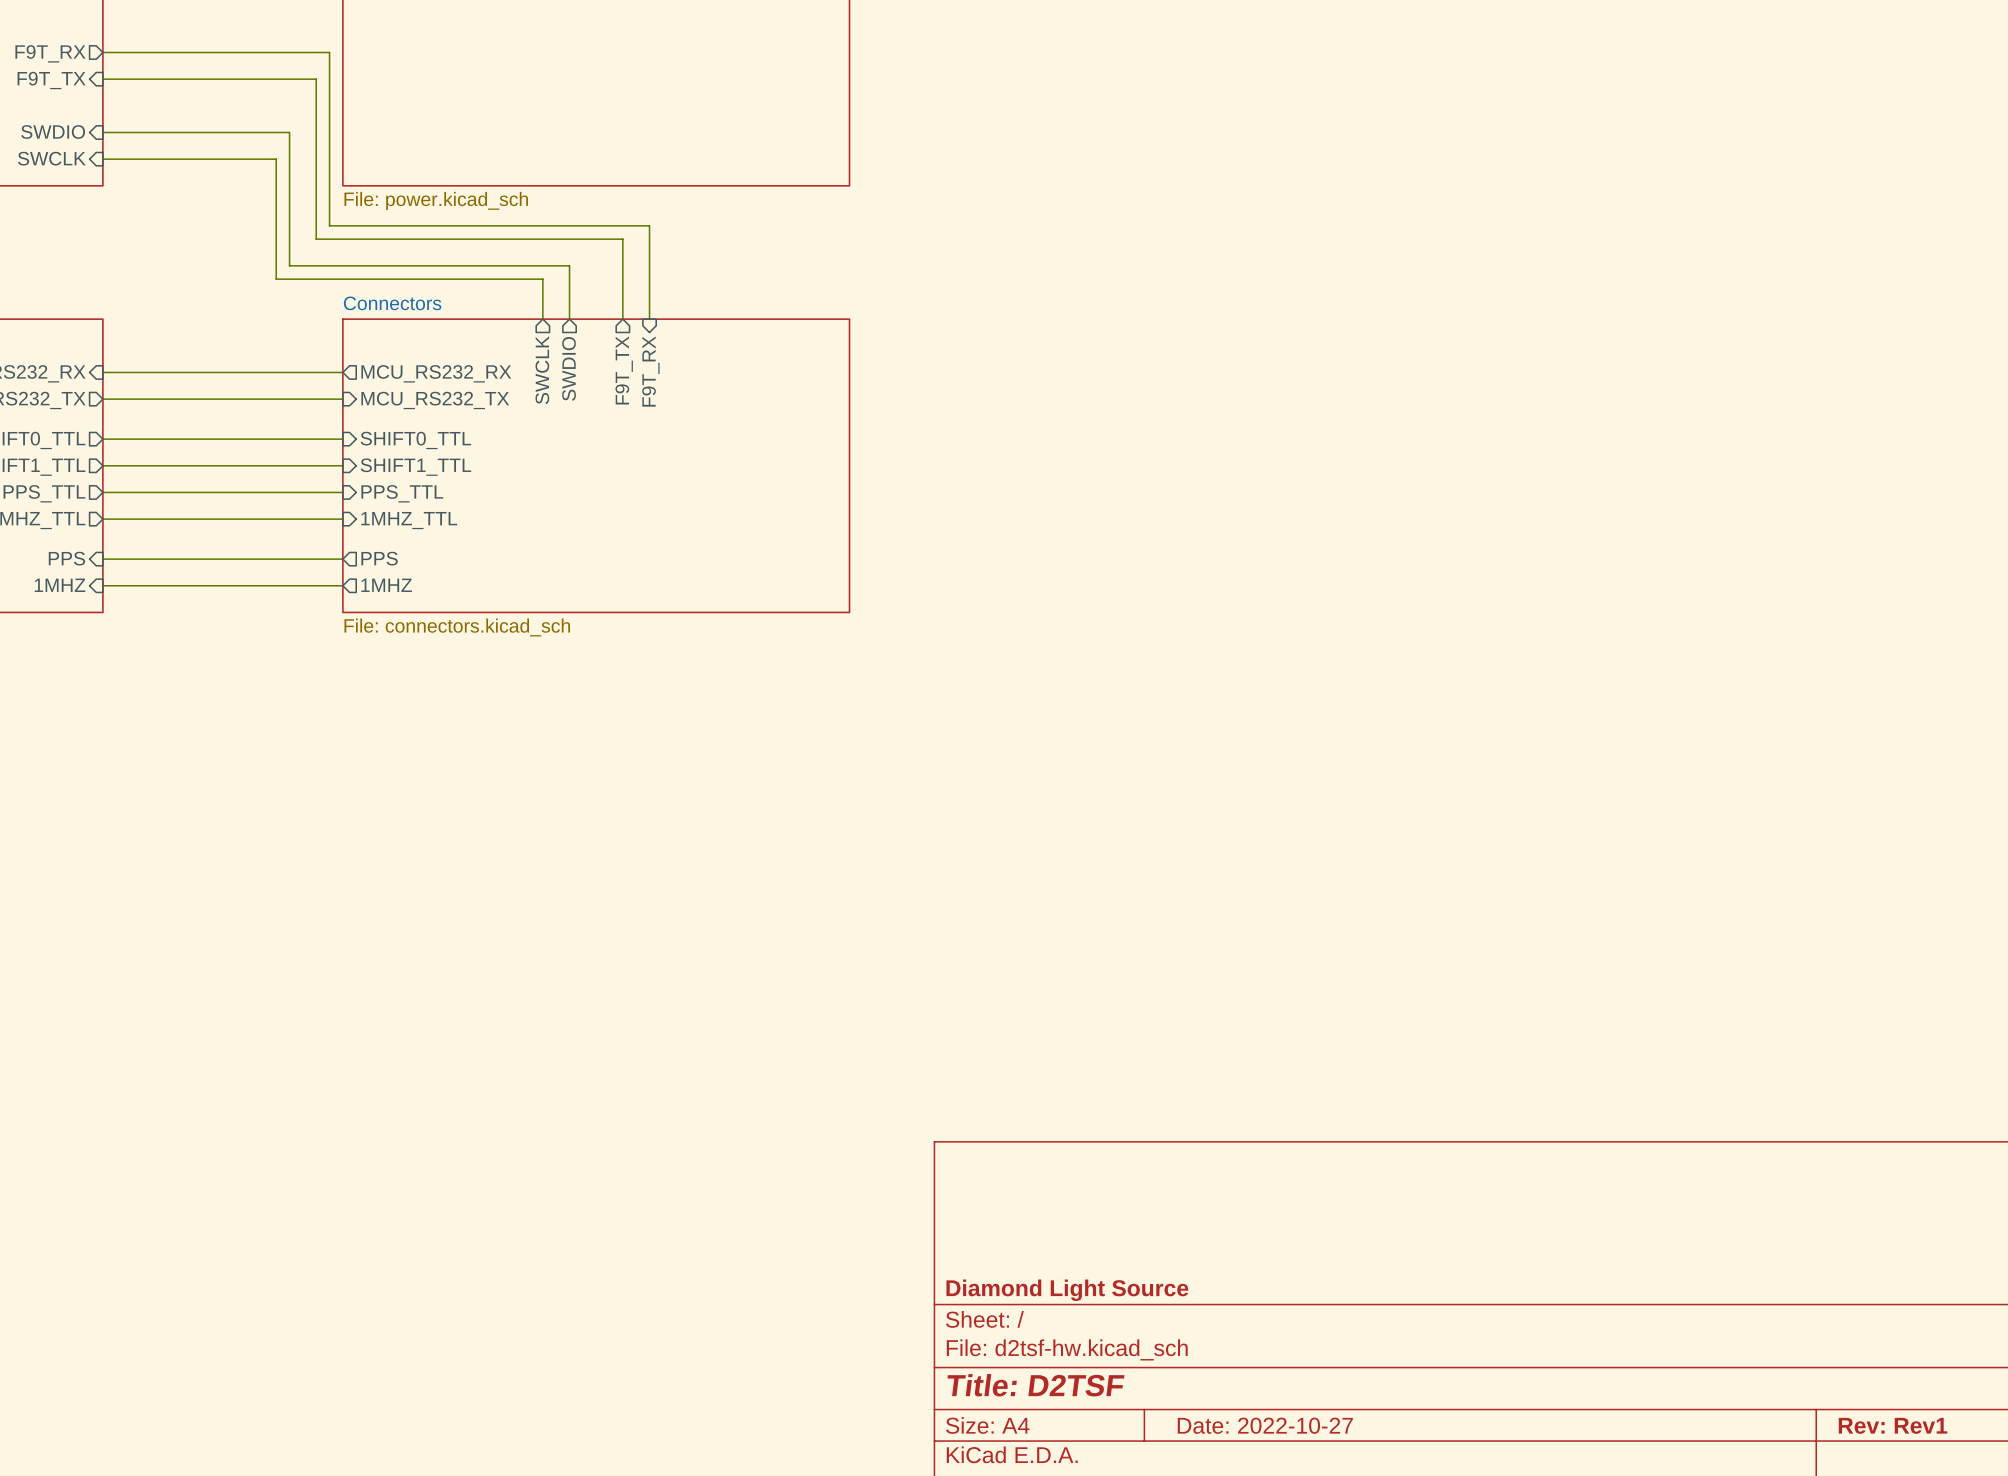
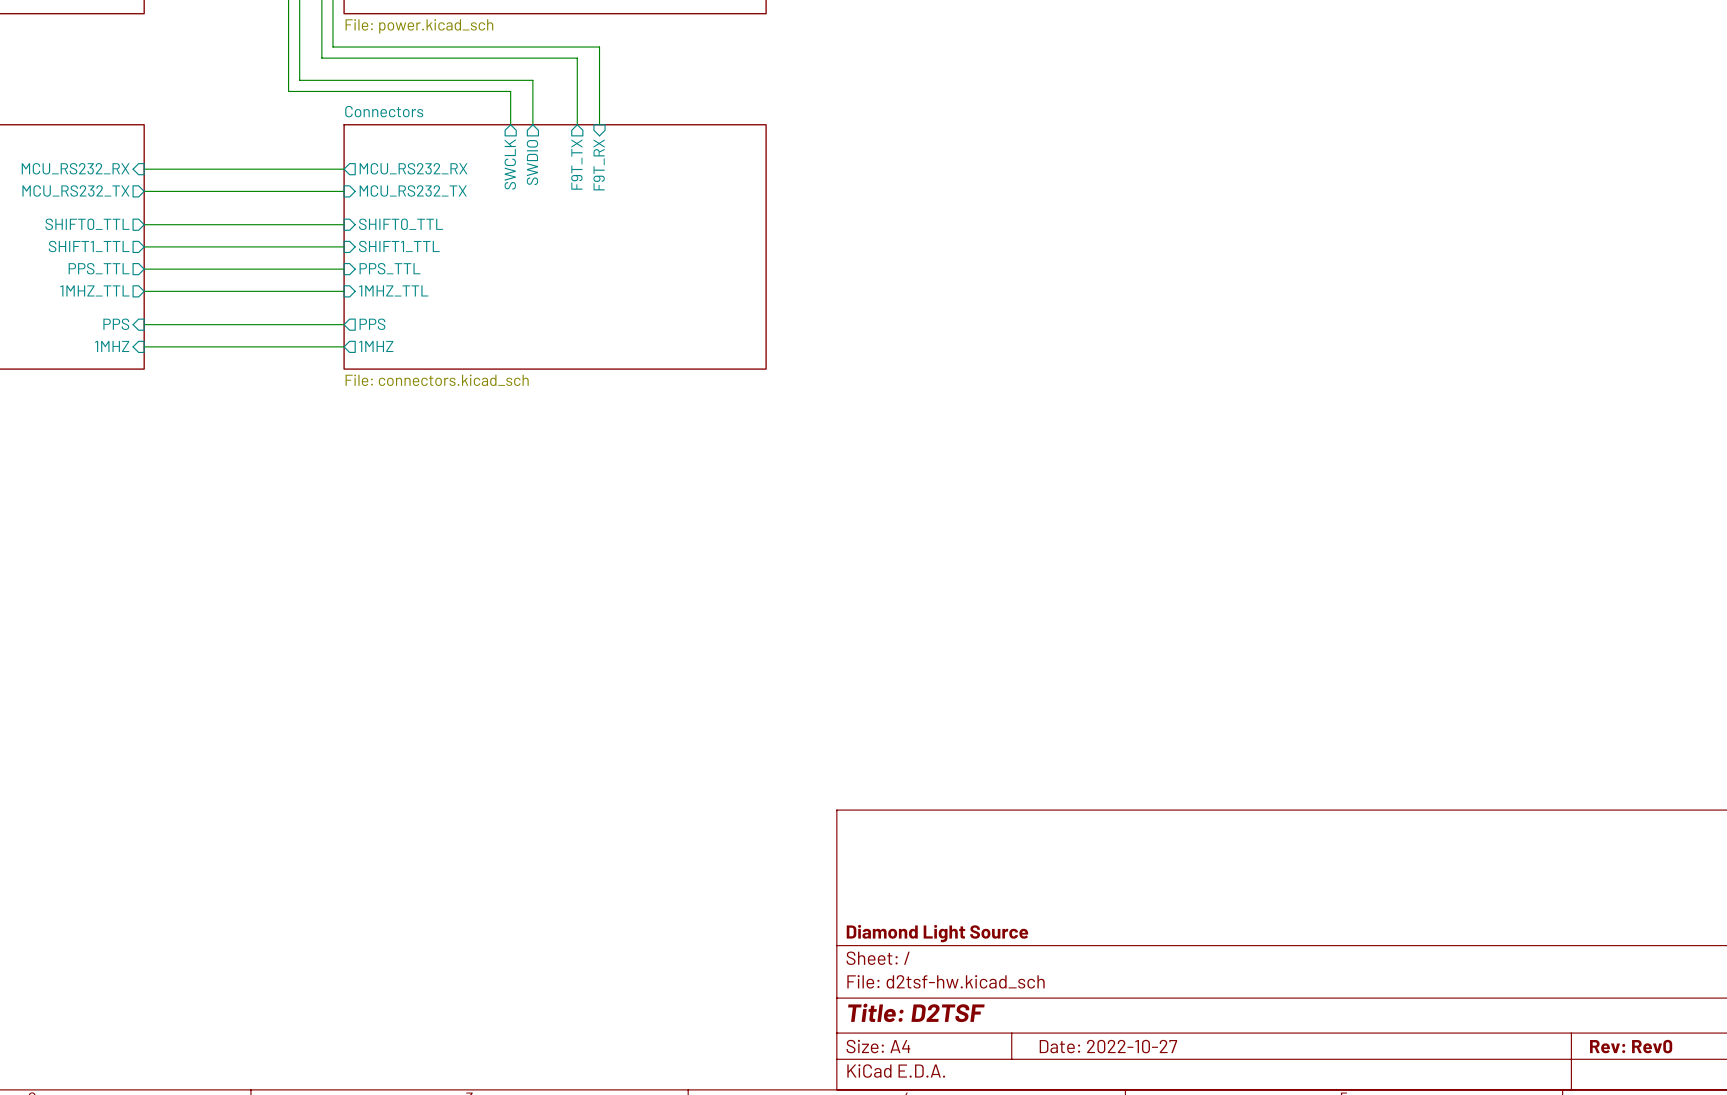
title block: Rev: Rev1 (1893, 1425) -> Rev: Rev0 (1631, 1046)

